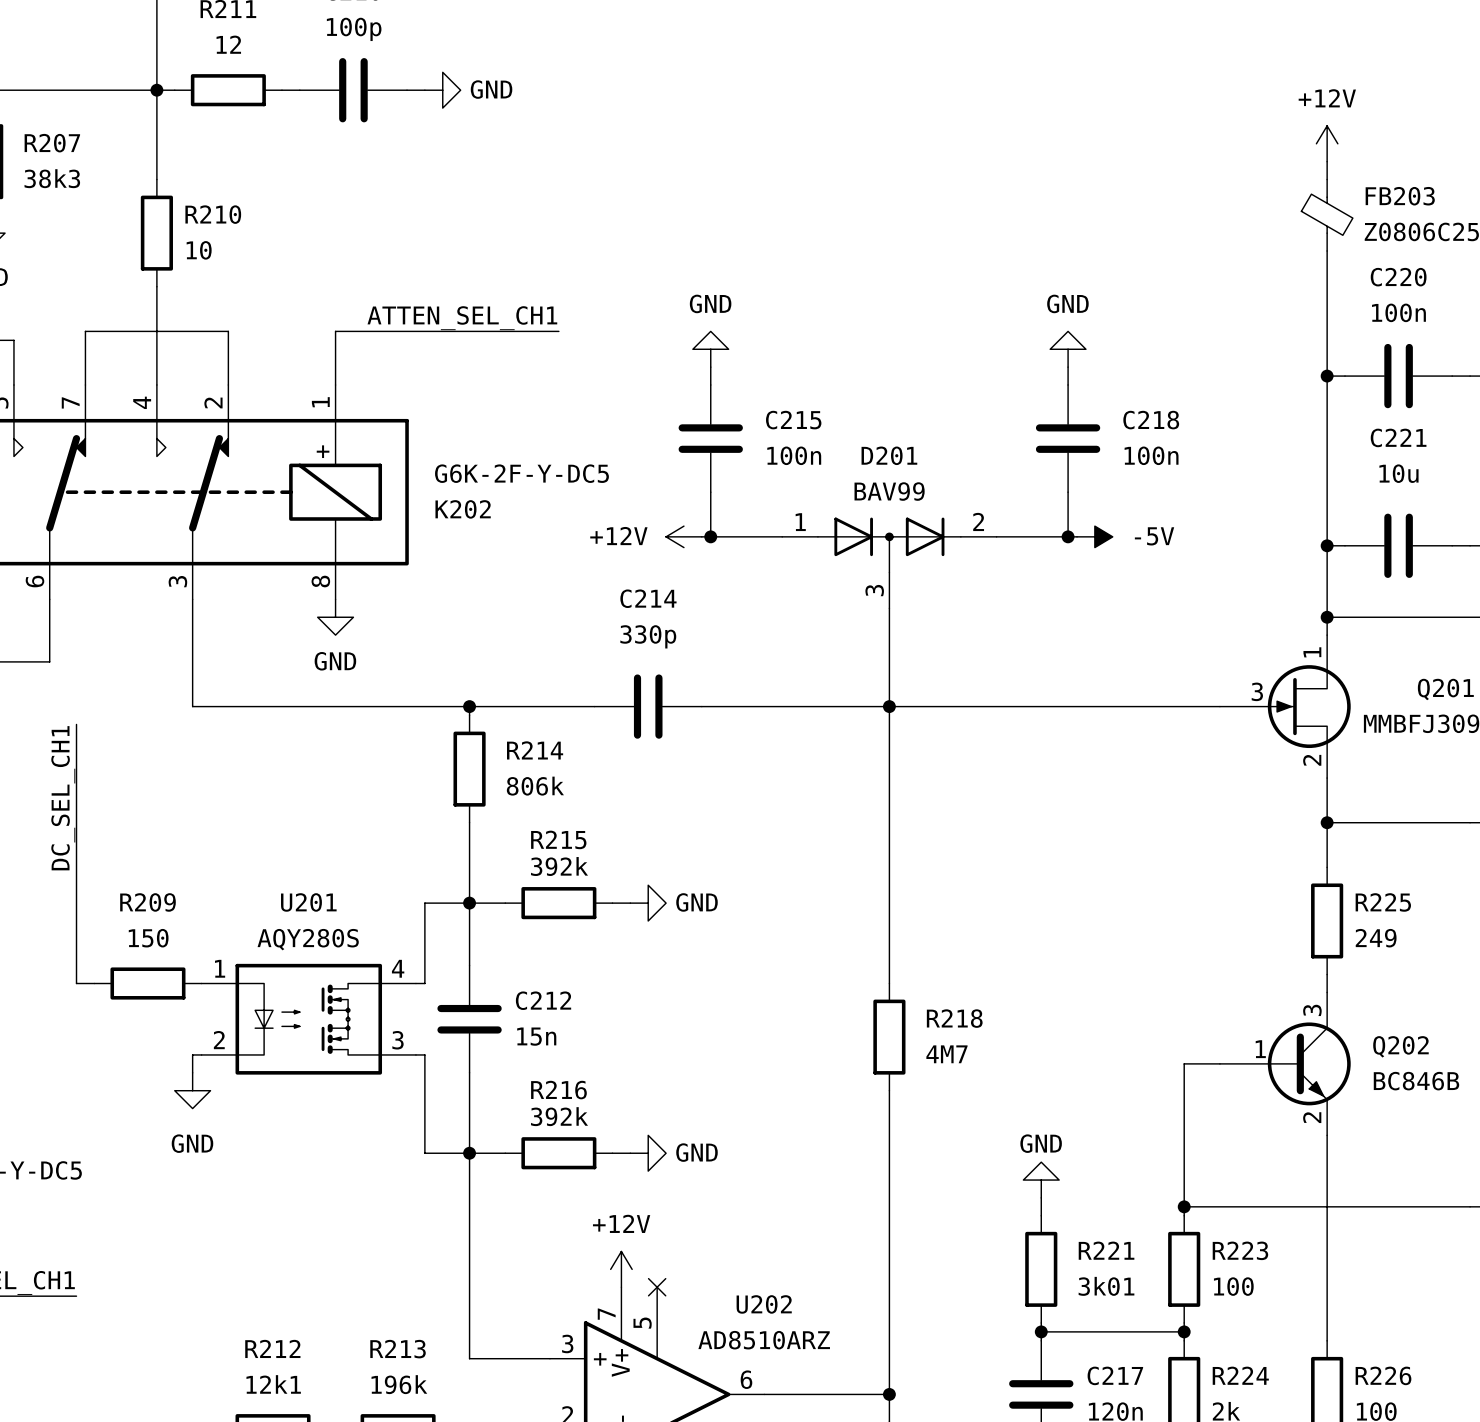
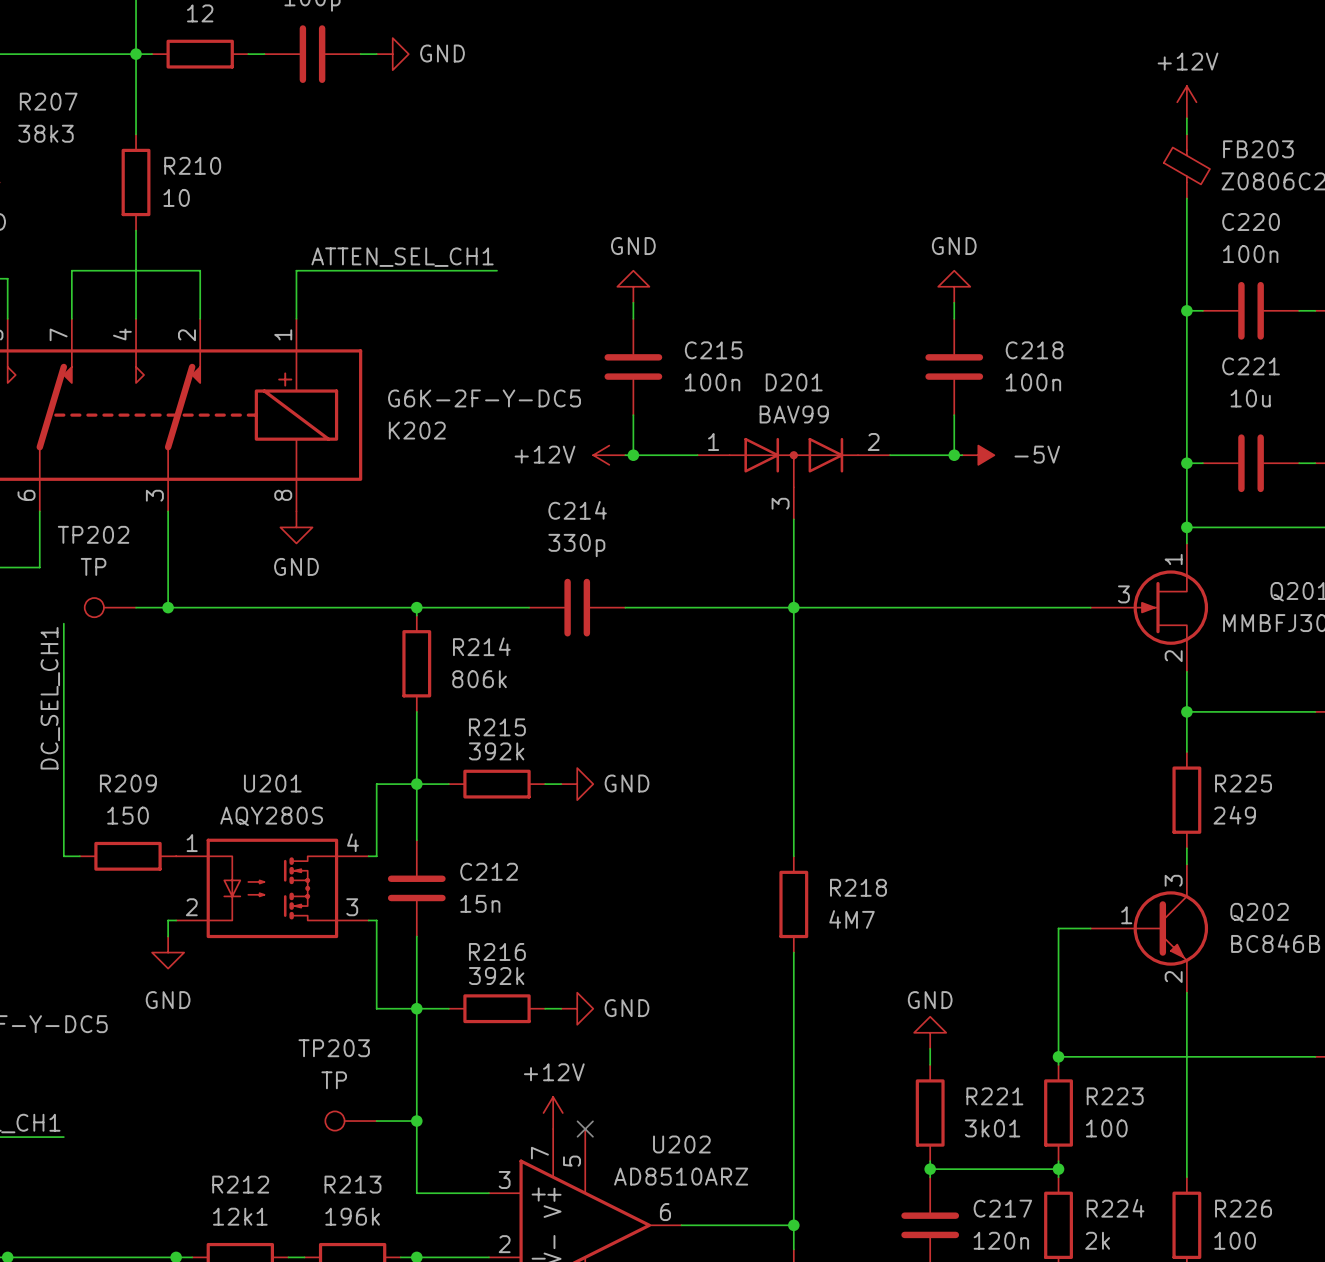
TP202: none -> TP (110, 607)
wire: none -> (136, 607) (168, 607)
junction: none -> (168, 607)
TP203: none -> TP (351, 1121)
wire: none -> (376, 1121) (416, 1121)
junction: none -> (416, 1121)

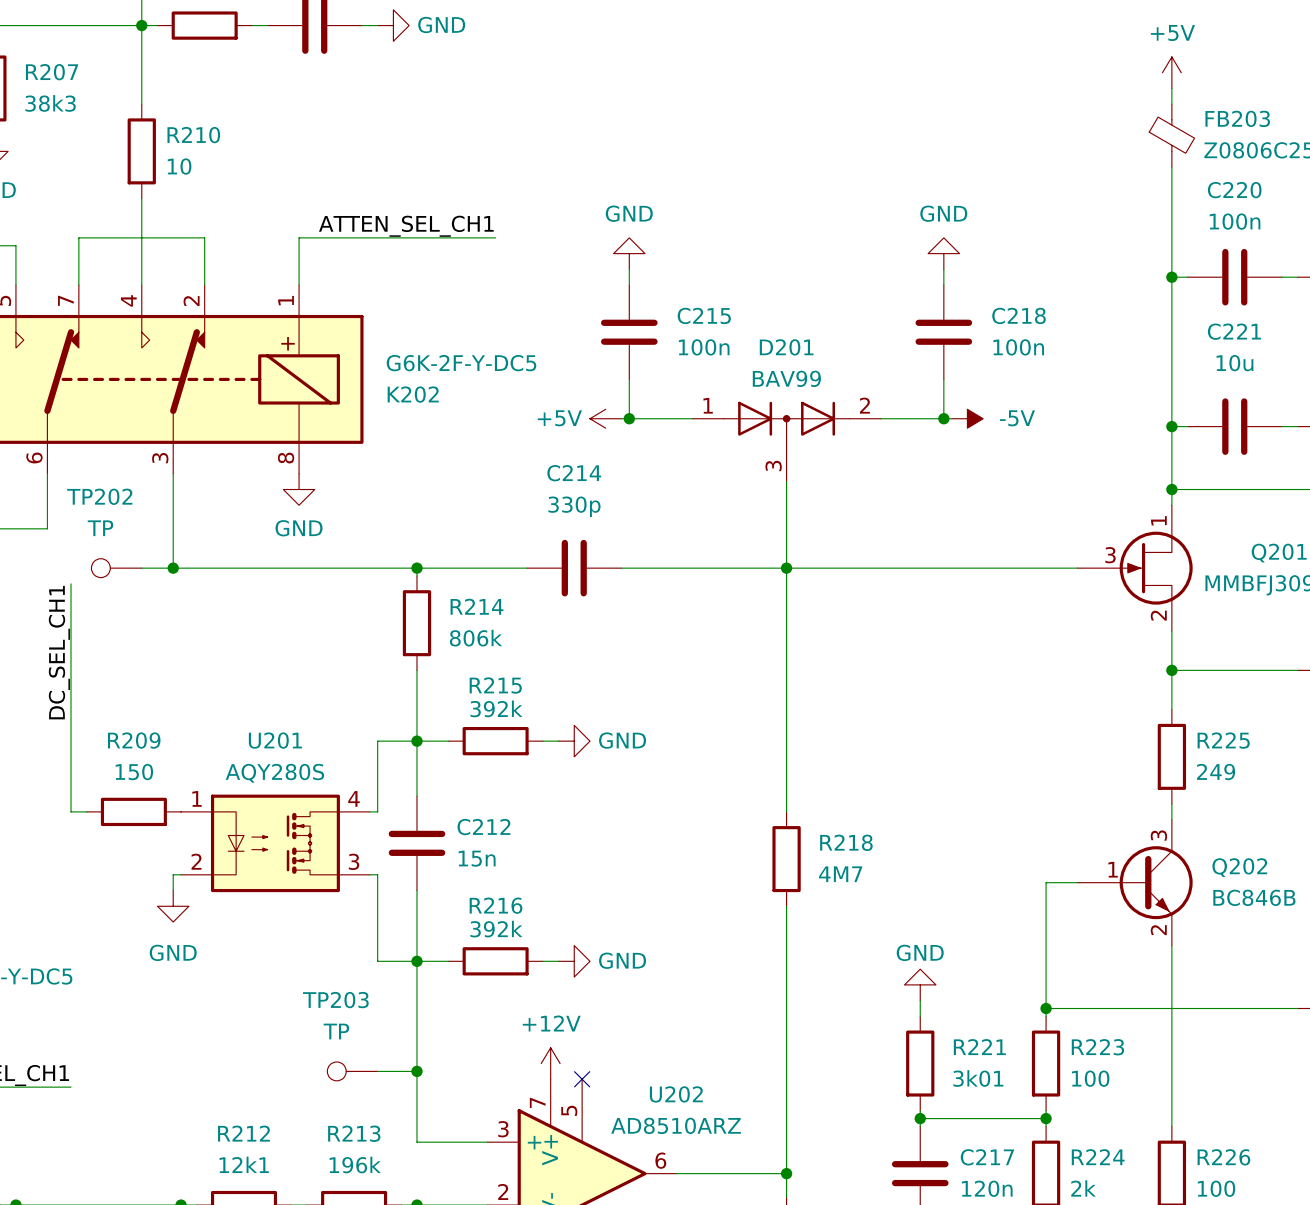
power symbol: +12V (1186, 102) -> +5V (1171, 72)
power symbol: +12V (609, 455) -> +5V (605, 418)

